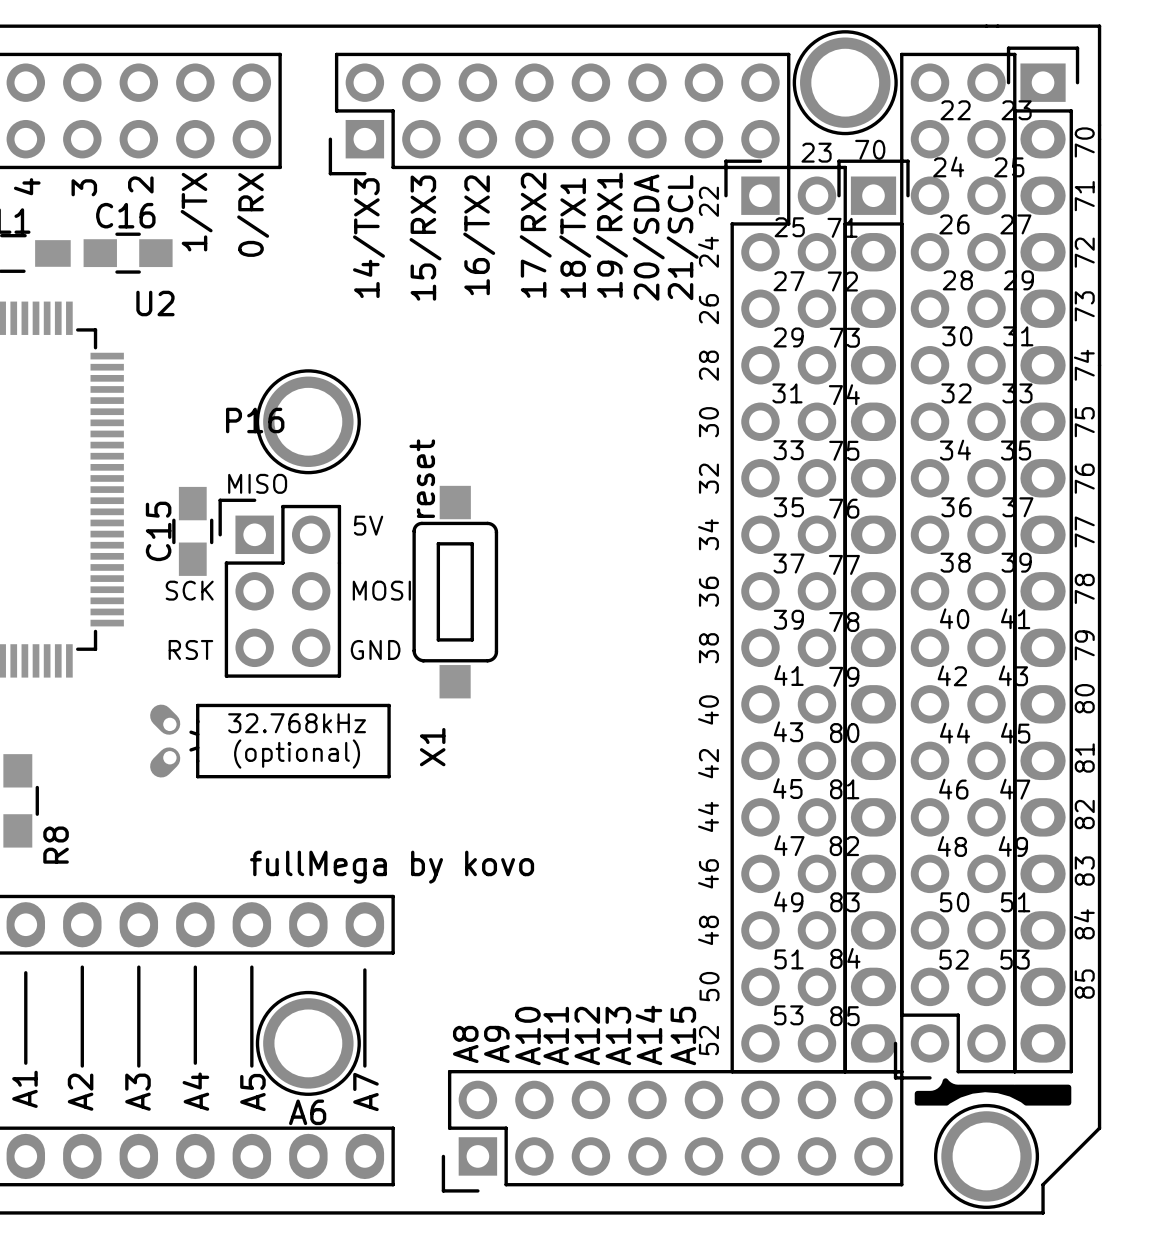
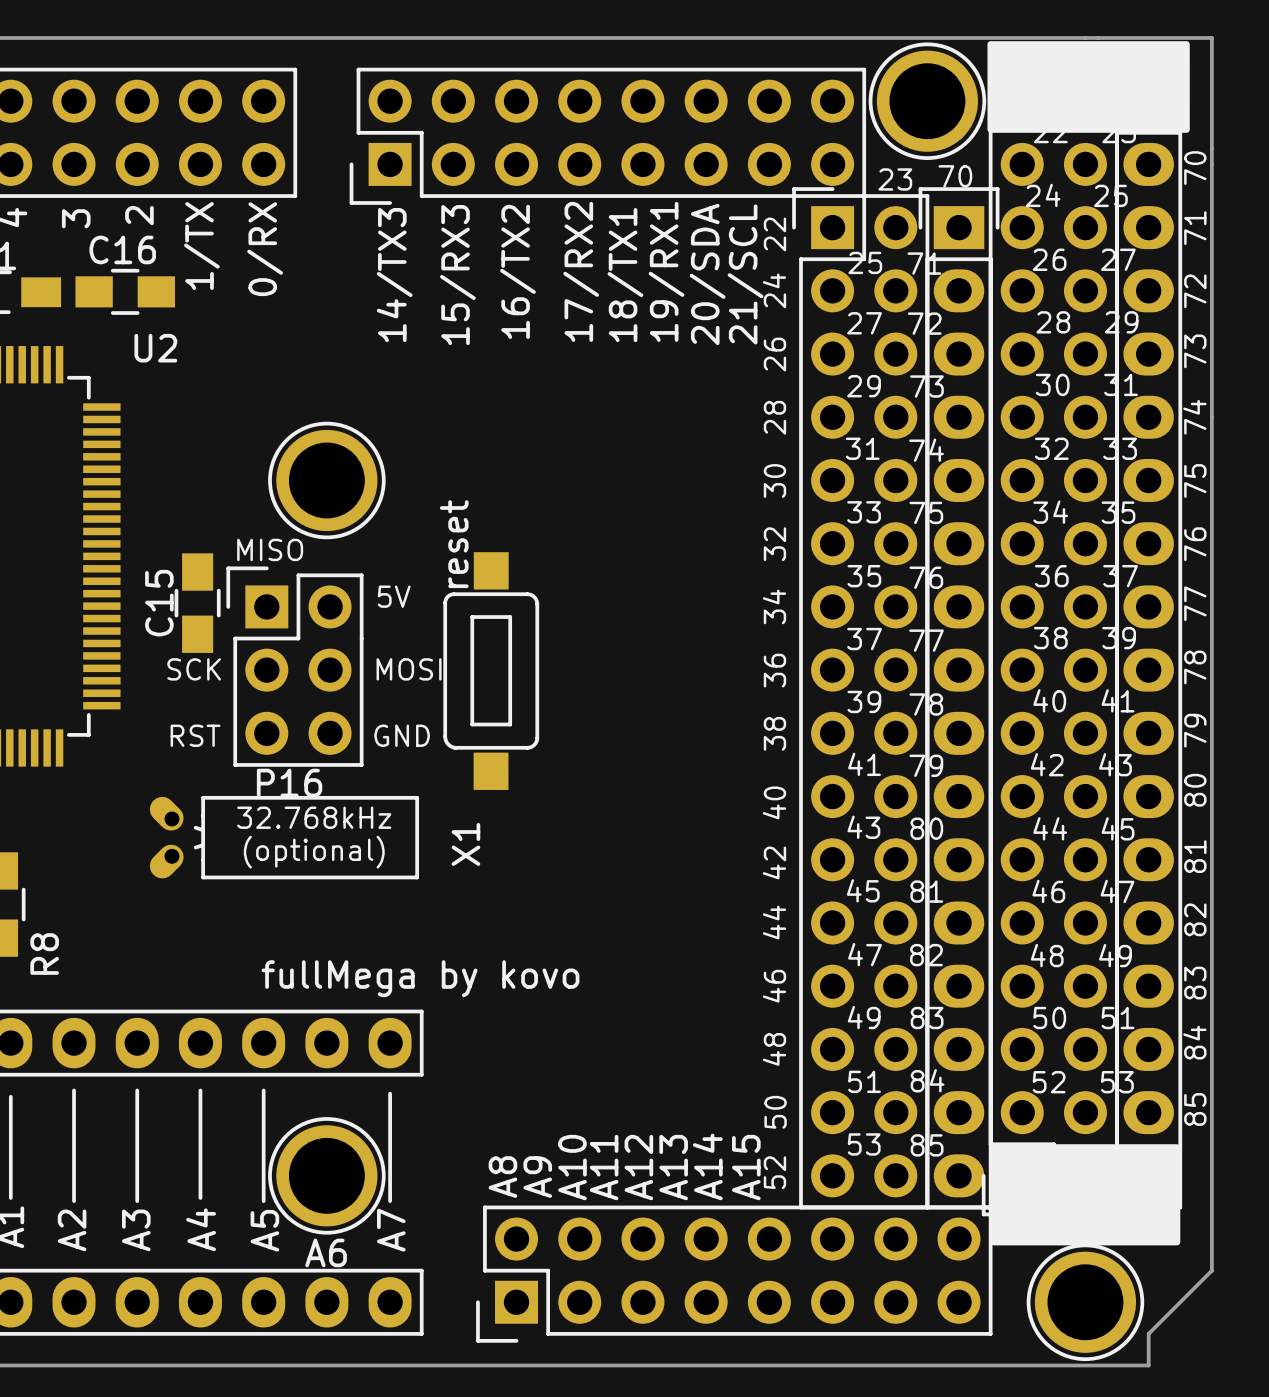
drawing: none -> [987, 41, 1190, 133]
P16 name position: P16 (255, 420) -> P16 (289, 782)
drawing: none -> [990, 1144, 1181, 1246]
drawing: [914, 1078, 1072, 1106] -> none

